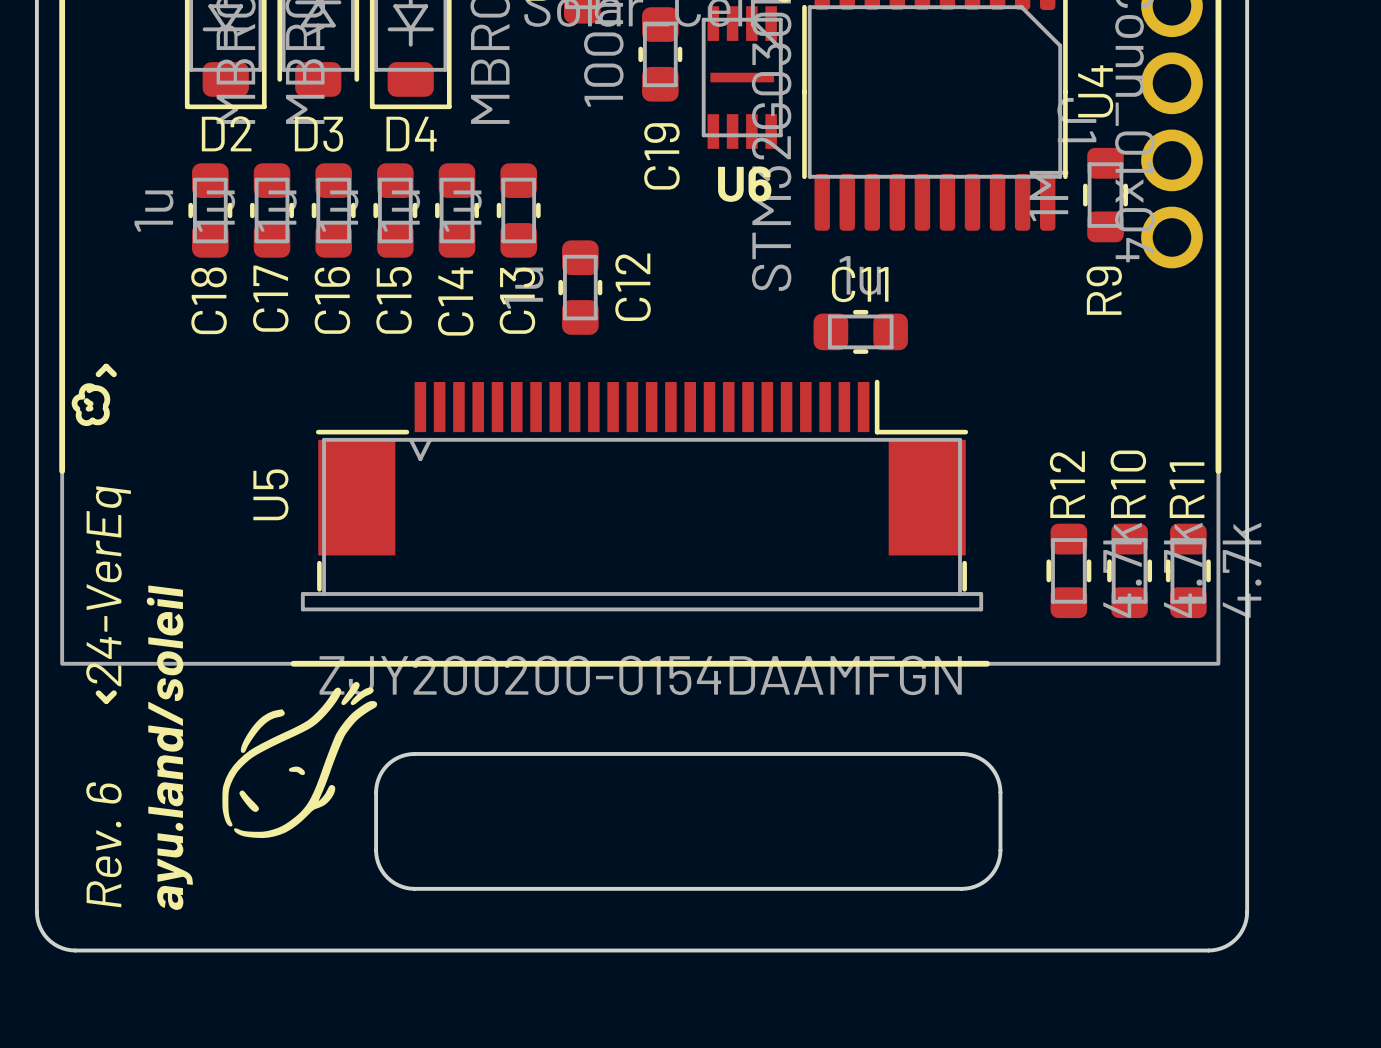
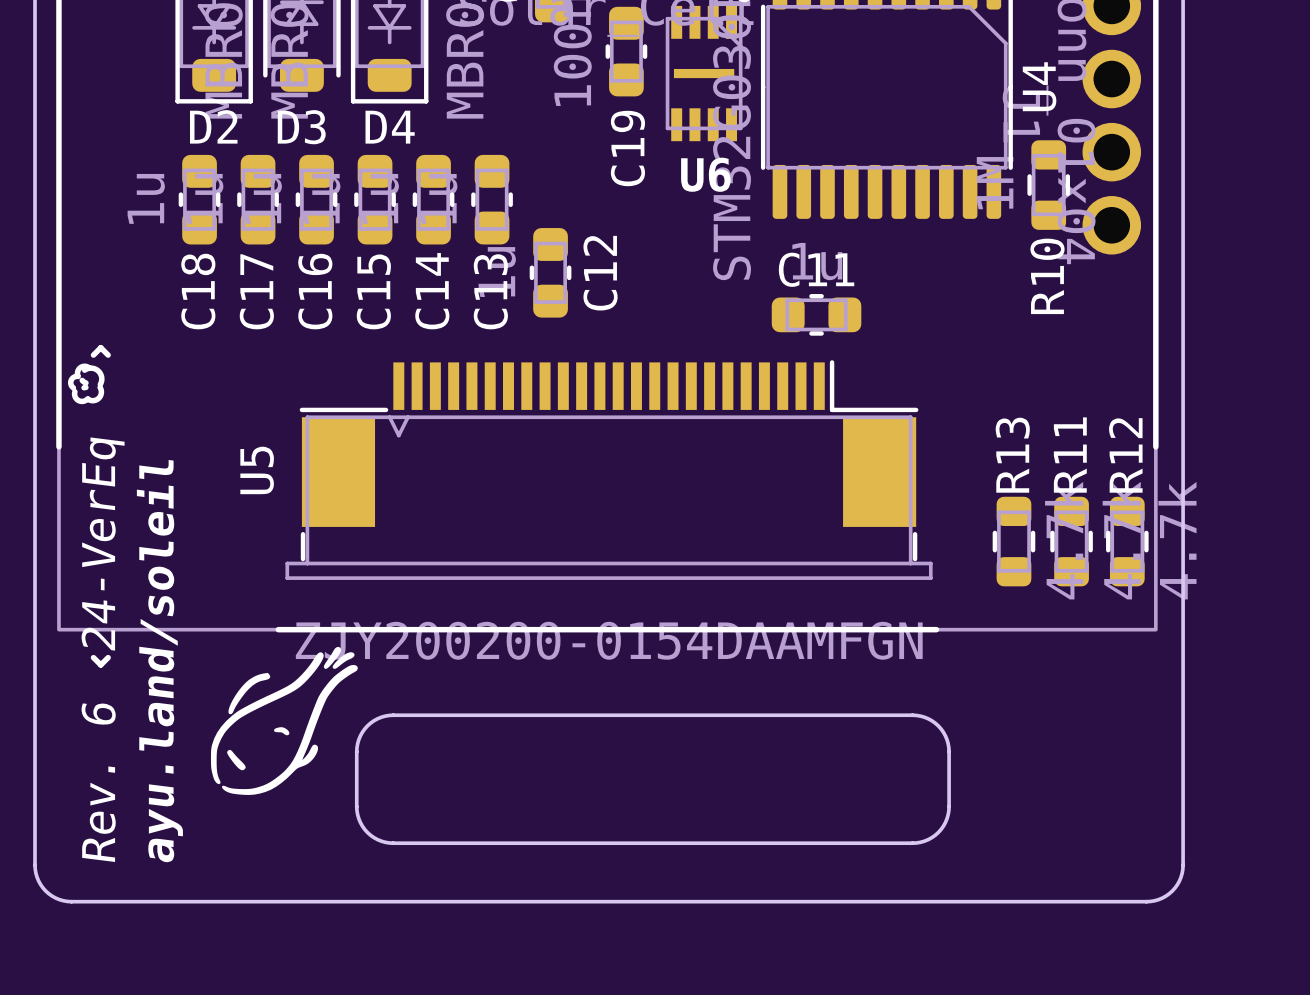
R9 name: R9 (1104, 290) -> R10 (1047, 276)
R12 name: R12 (1067, 484) -> R13 (1012, 455)
R10 name: R10 (1128, 484) -> R11 (1070, 455)
R11 name: R11 (1187, 490) -> R12 (1125, 455)

